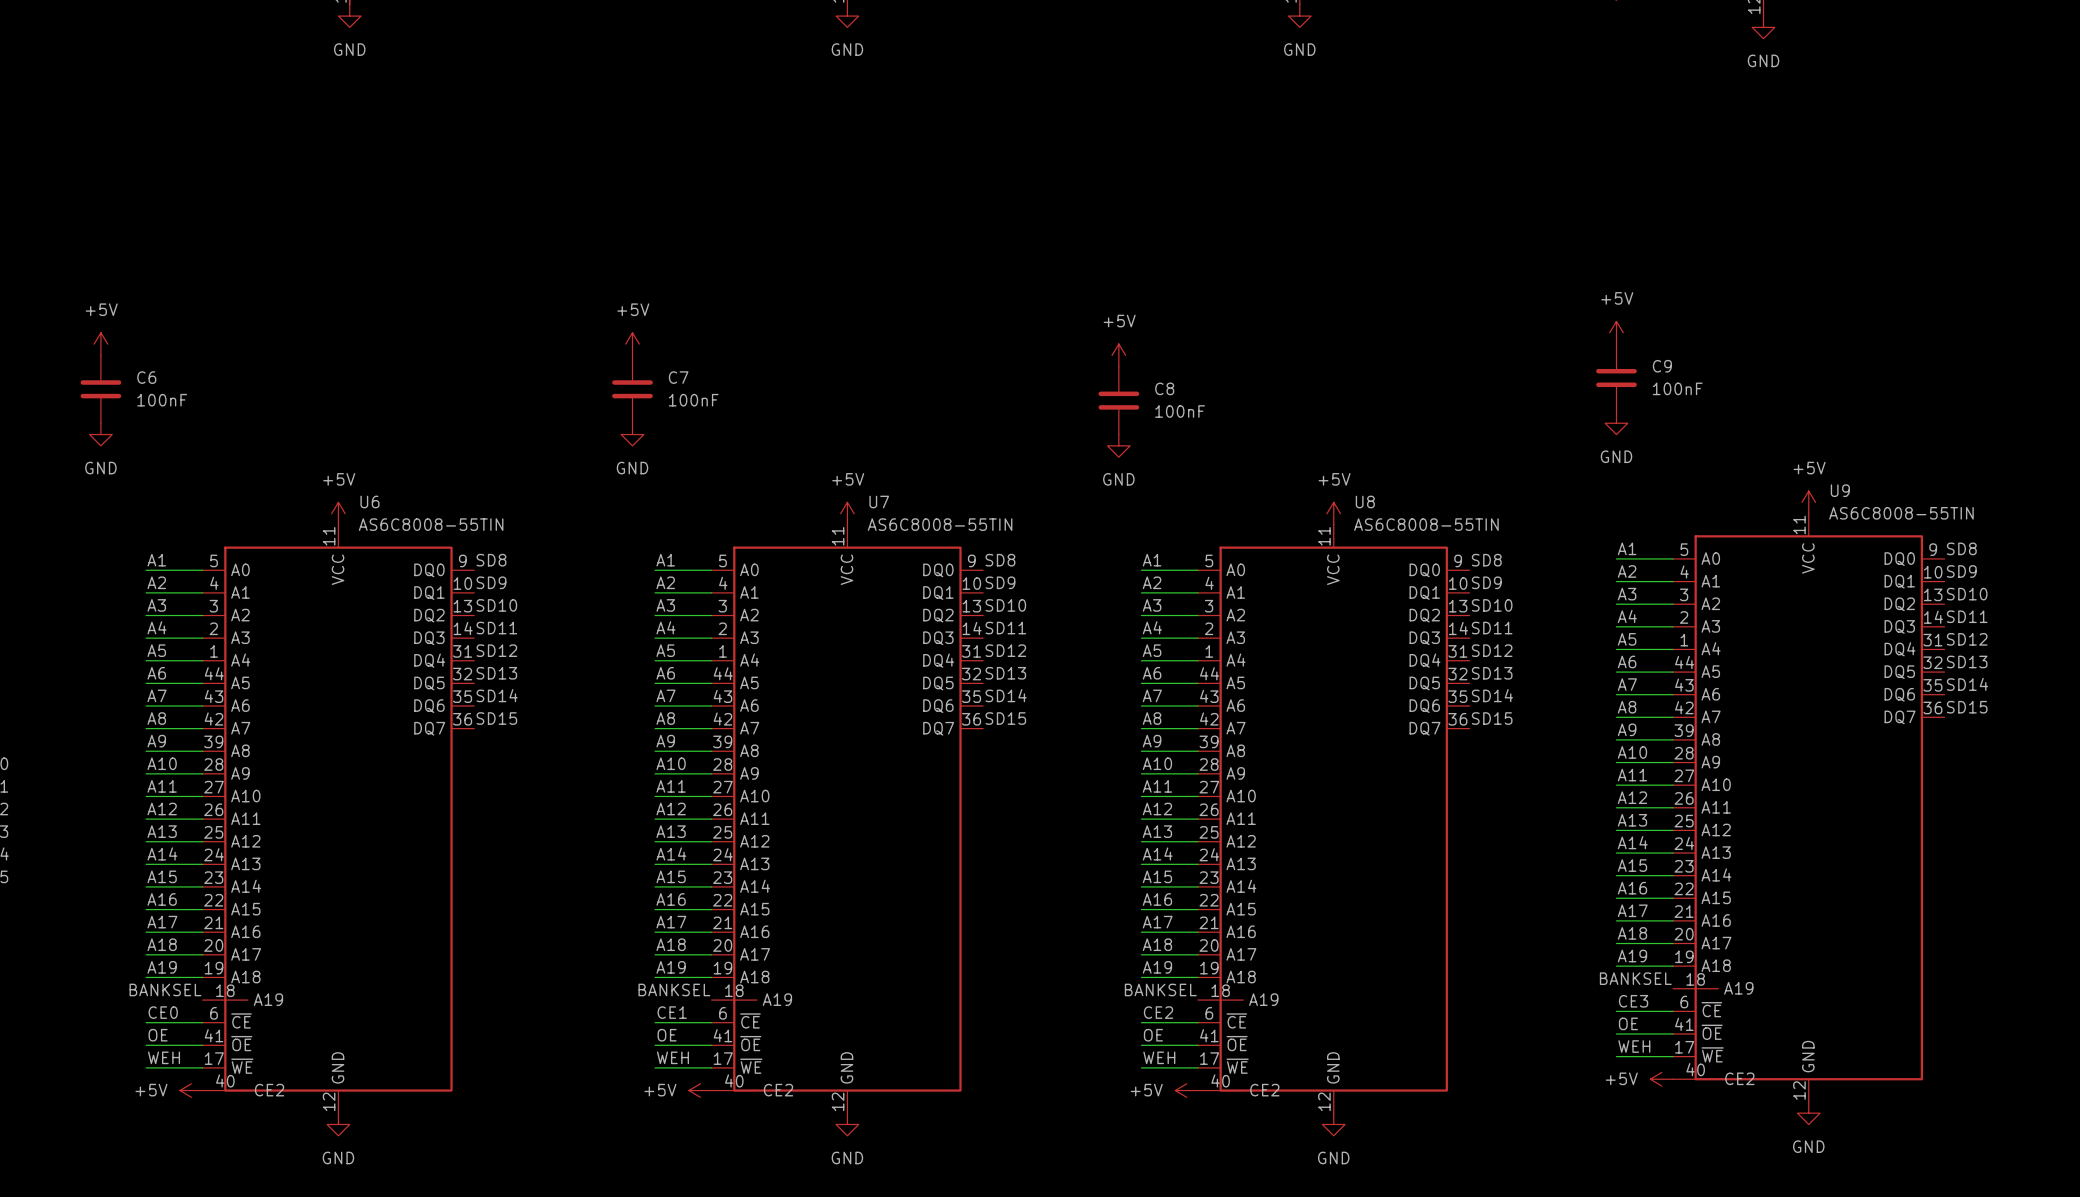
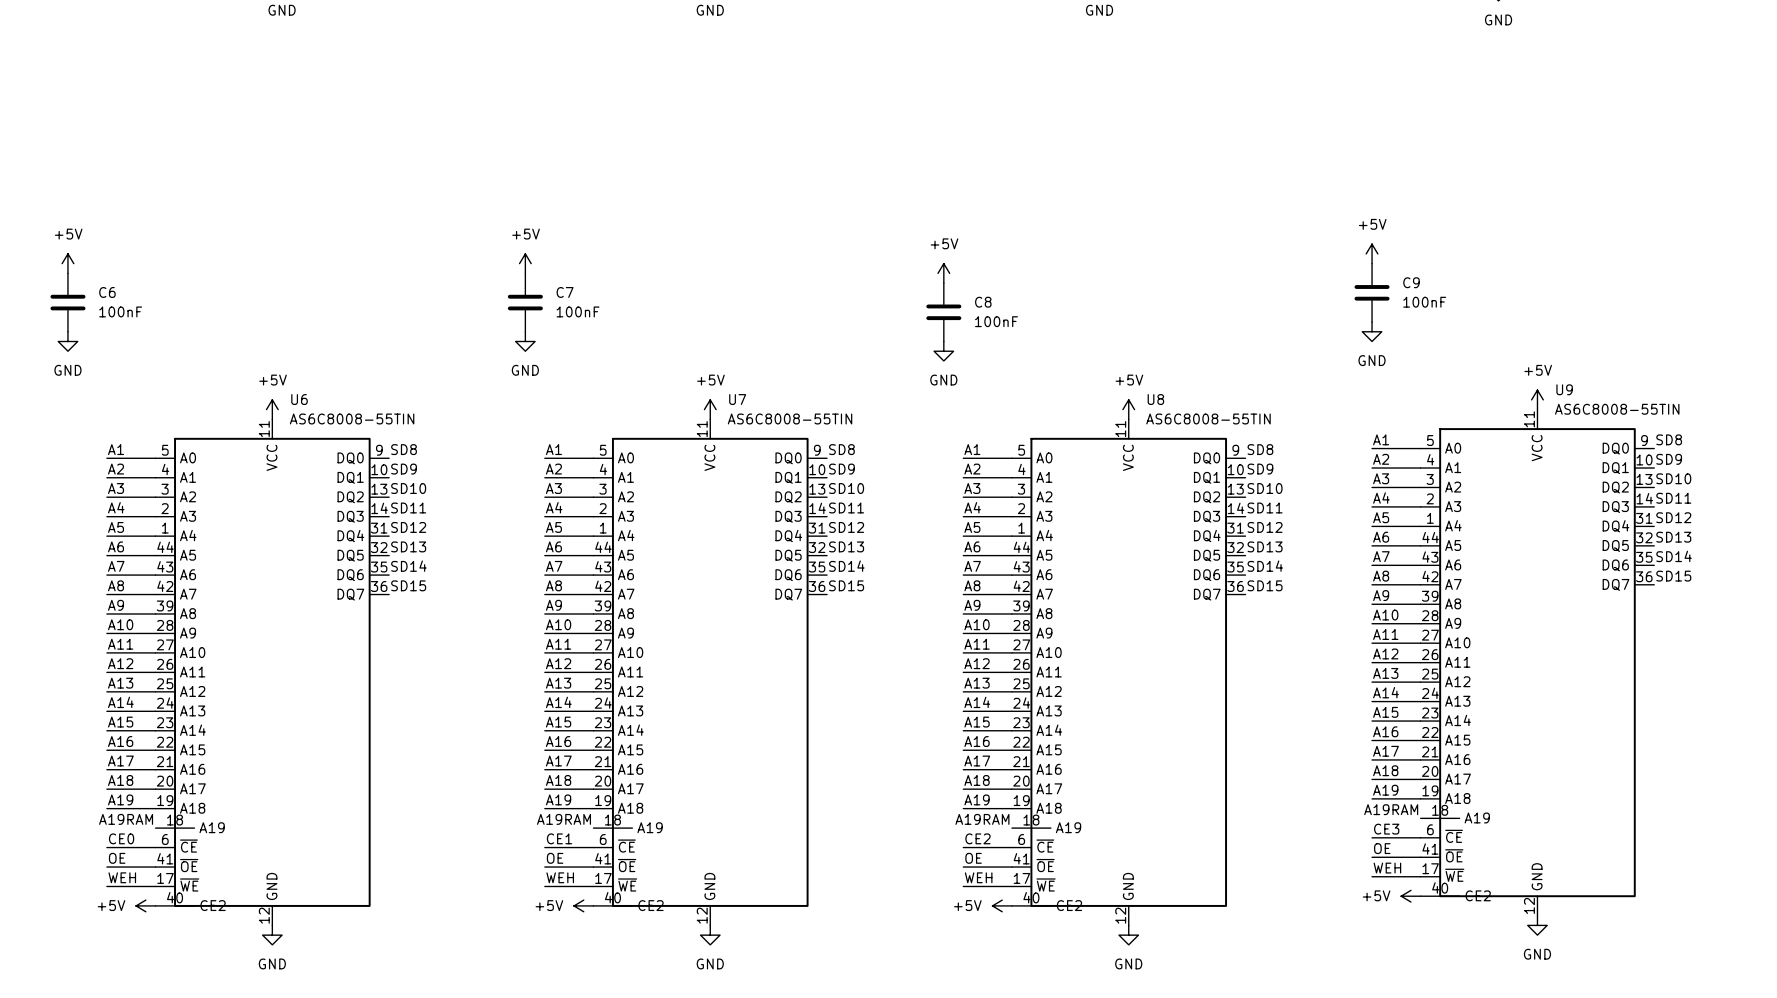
label: BANKSEL (1635, 978) -> A19RAM (1391, 809)
label: BANKSEL (165, 989) -> A19RAM (126, 819)
label: BANKSEL (674, 989) -> A19RAM (563, 819)
label: BANKSEL (1160, 989) -> A19RAM (982, 819)

